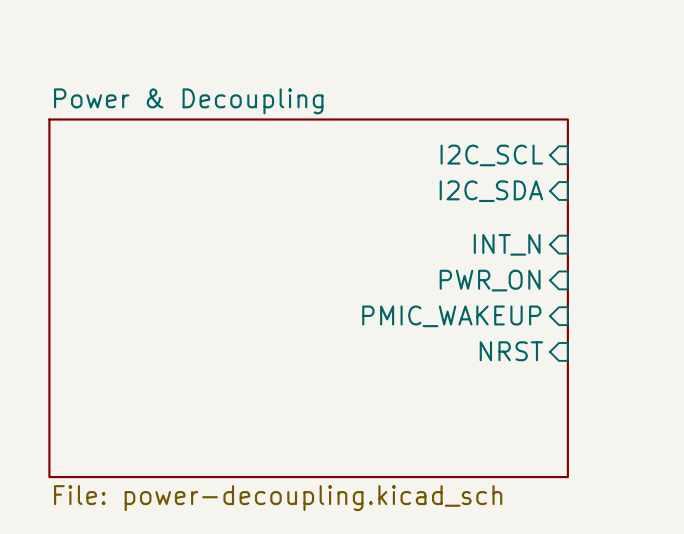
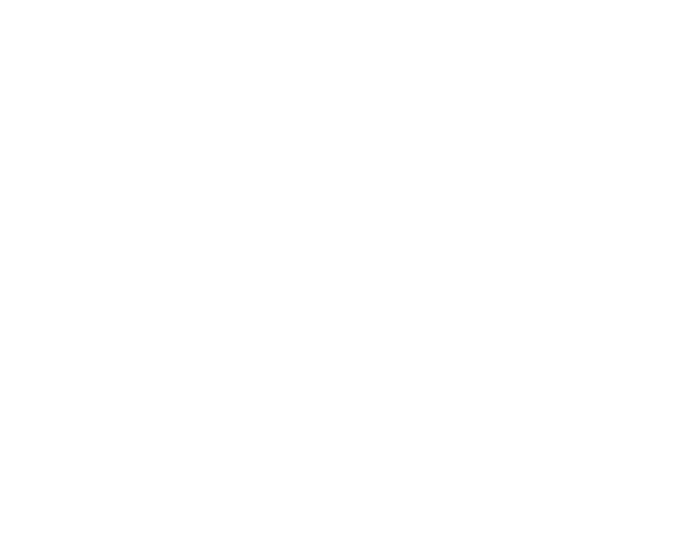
sheet pin: I2C_SCL (491, 155) -> none
sheet pin: I2C_SDA (491, 191) -> none
sheet pin: INT_N (507, 244) -> none
sheet pin: PWR_ON (490, 280) -> none
sheet Power & Decoupling: File: power-decoupling.kicad_sch (308, 298) -> none
sheet pin: PMIC_WAKEUP (451, 316) -> none
sheet pin: NRST (511, 351) -> none

